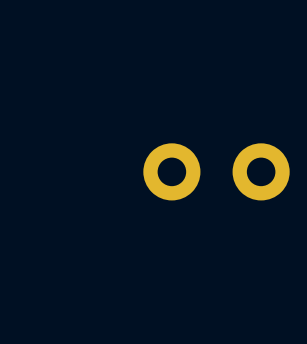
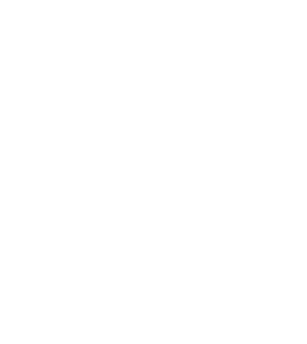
part: (216, 171) -> none

